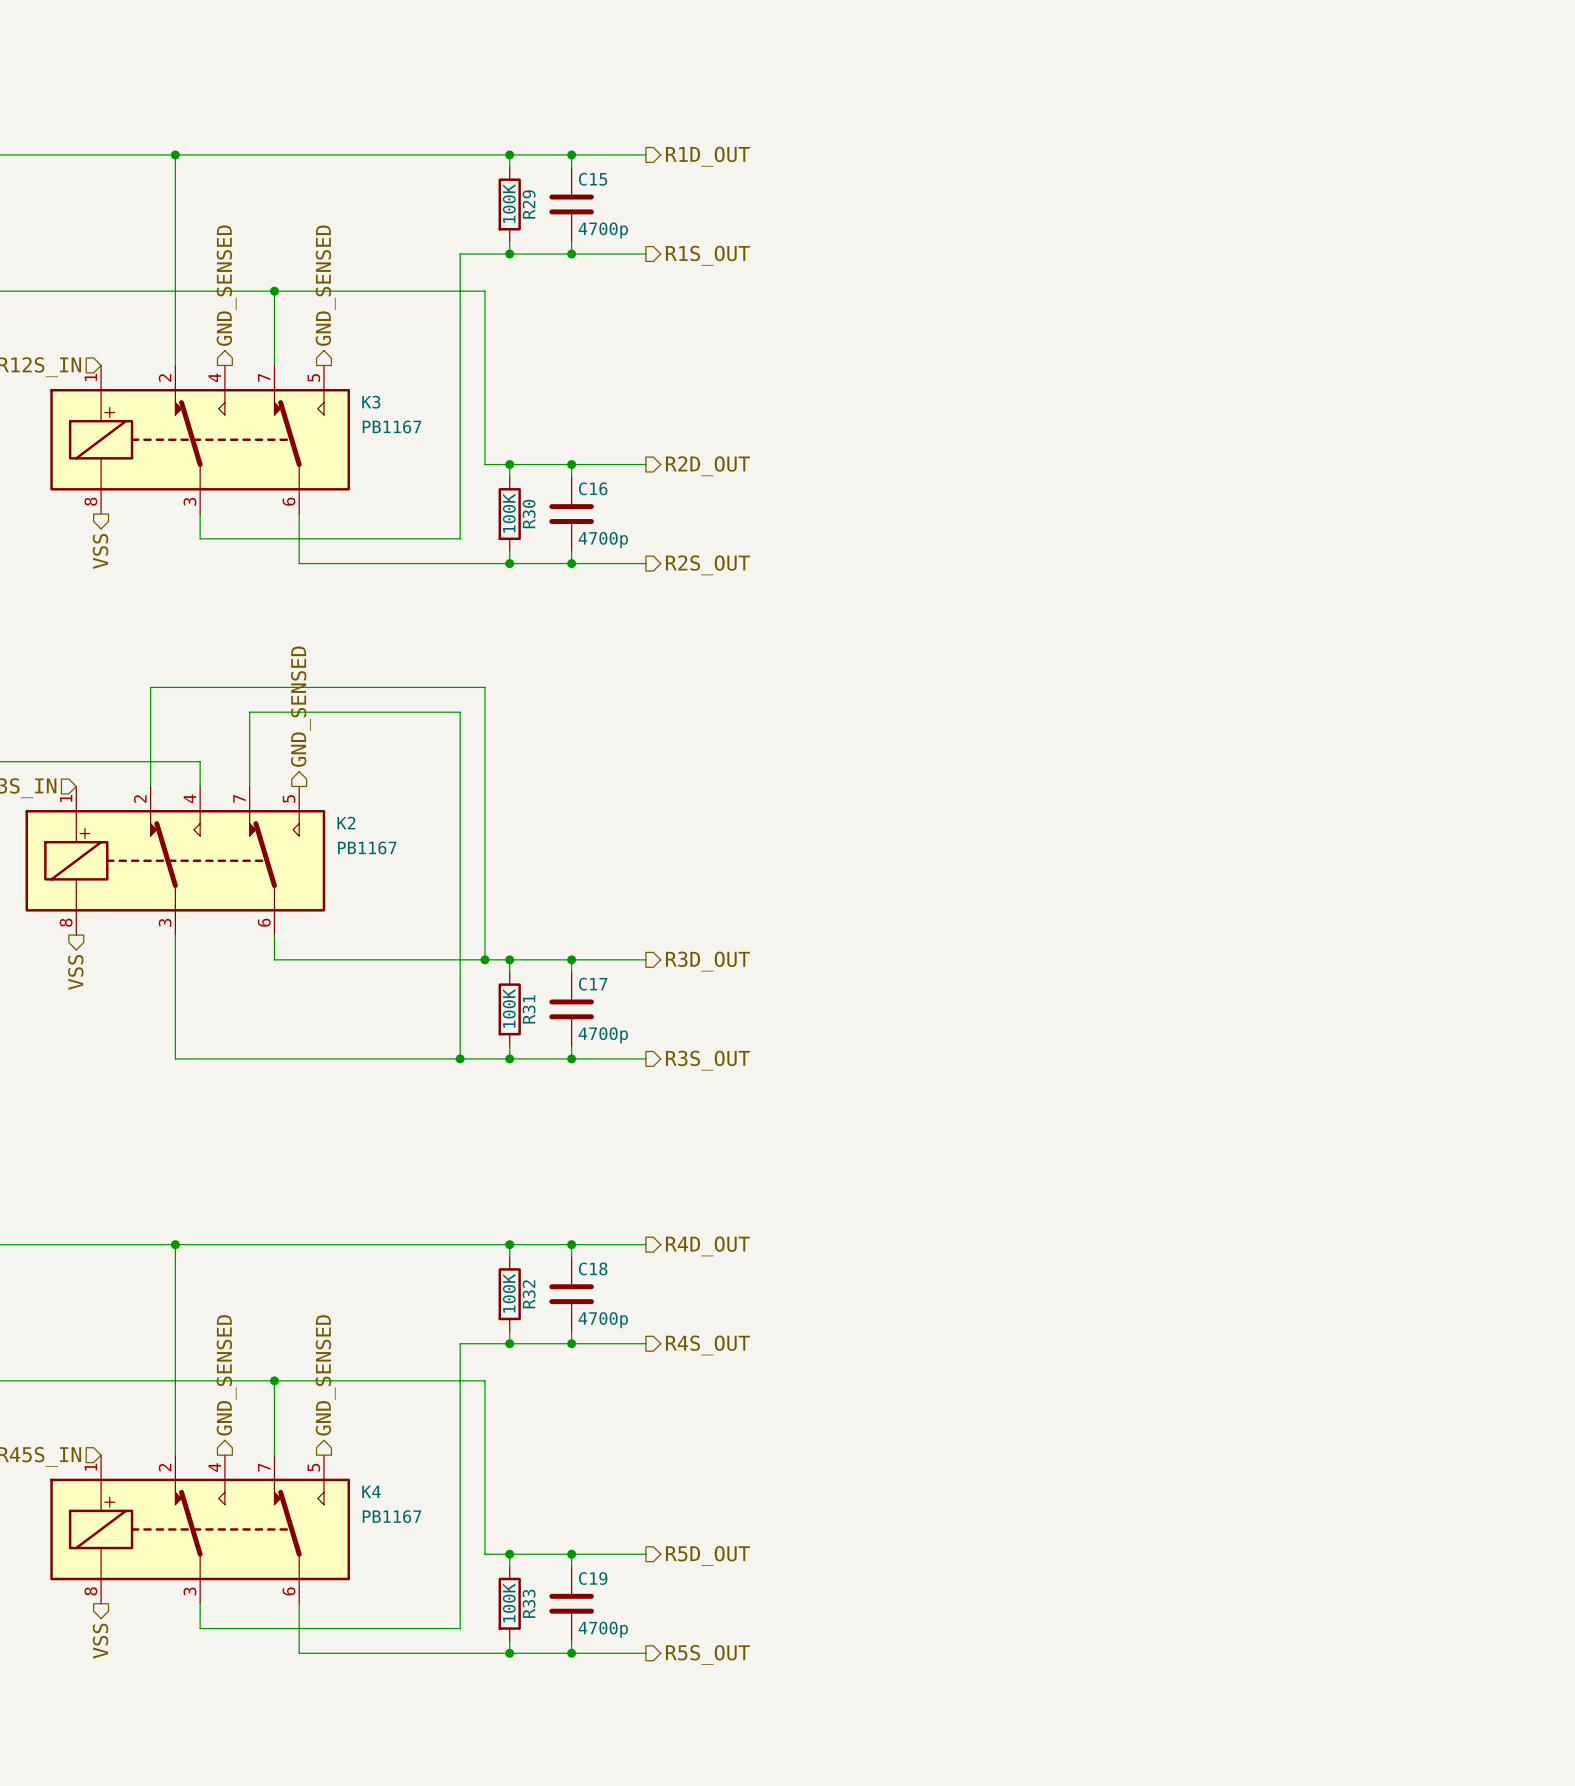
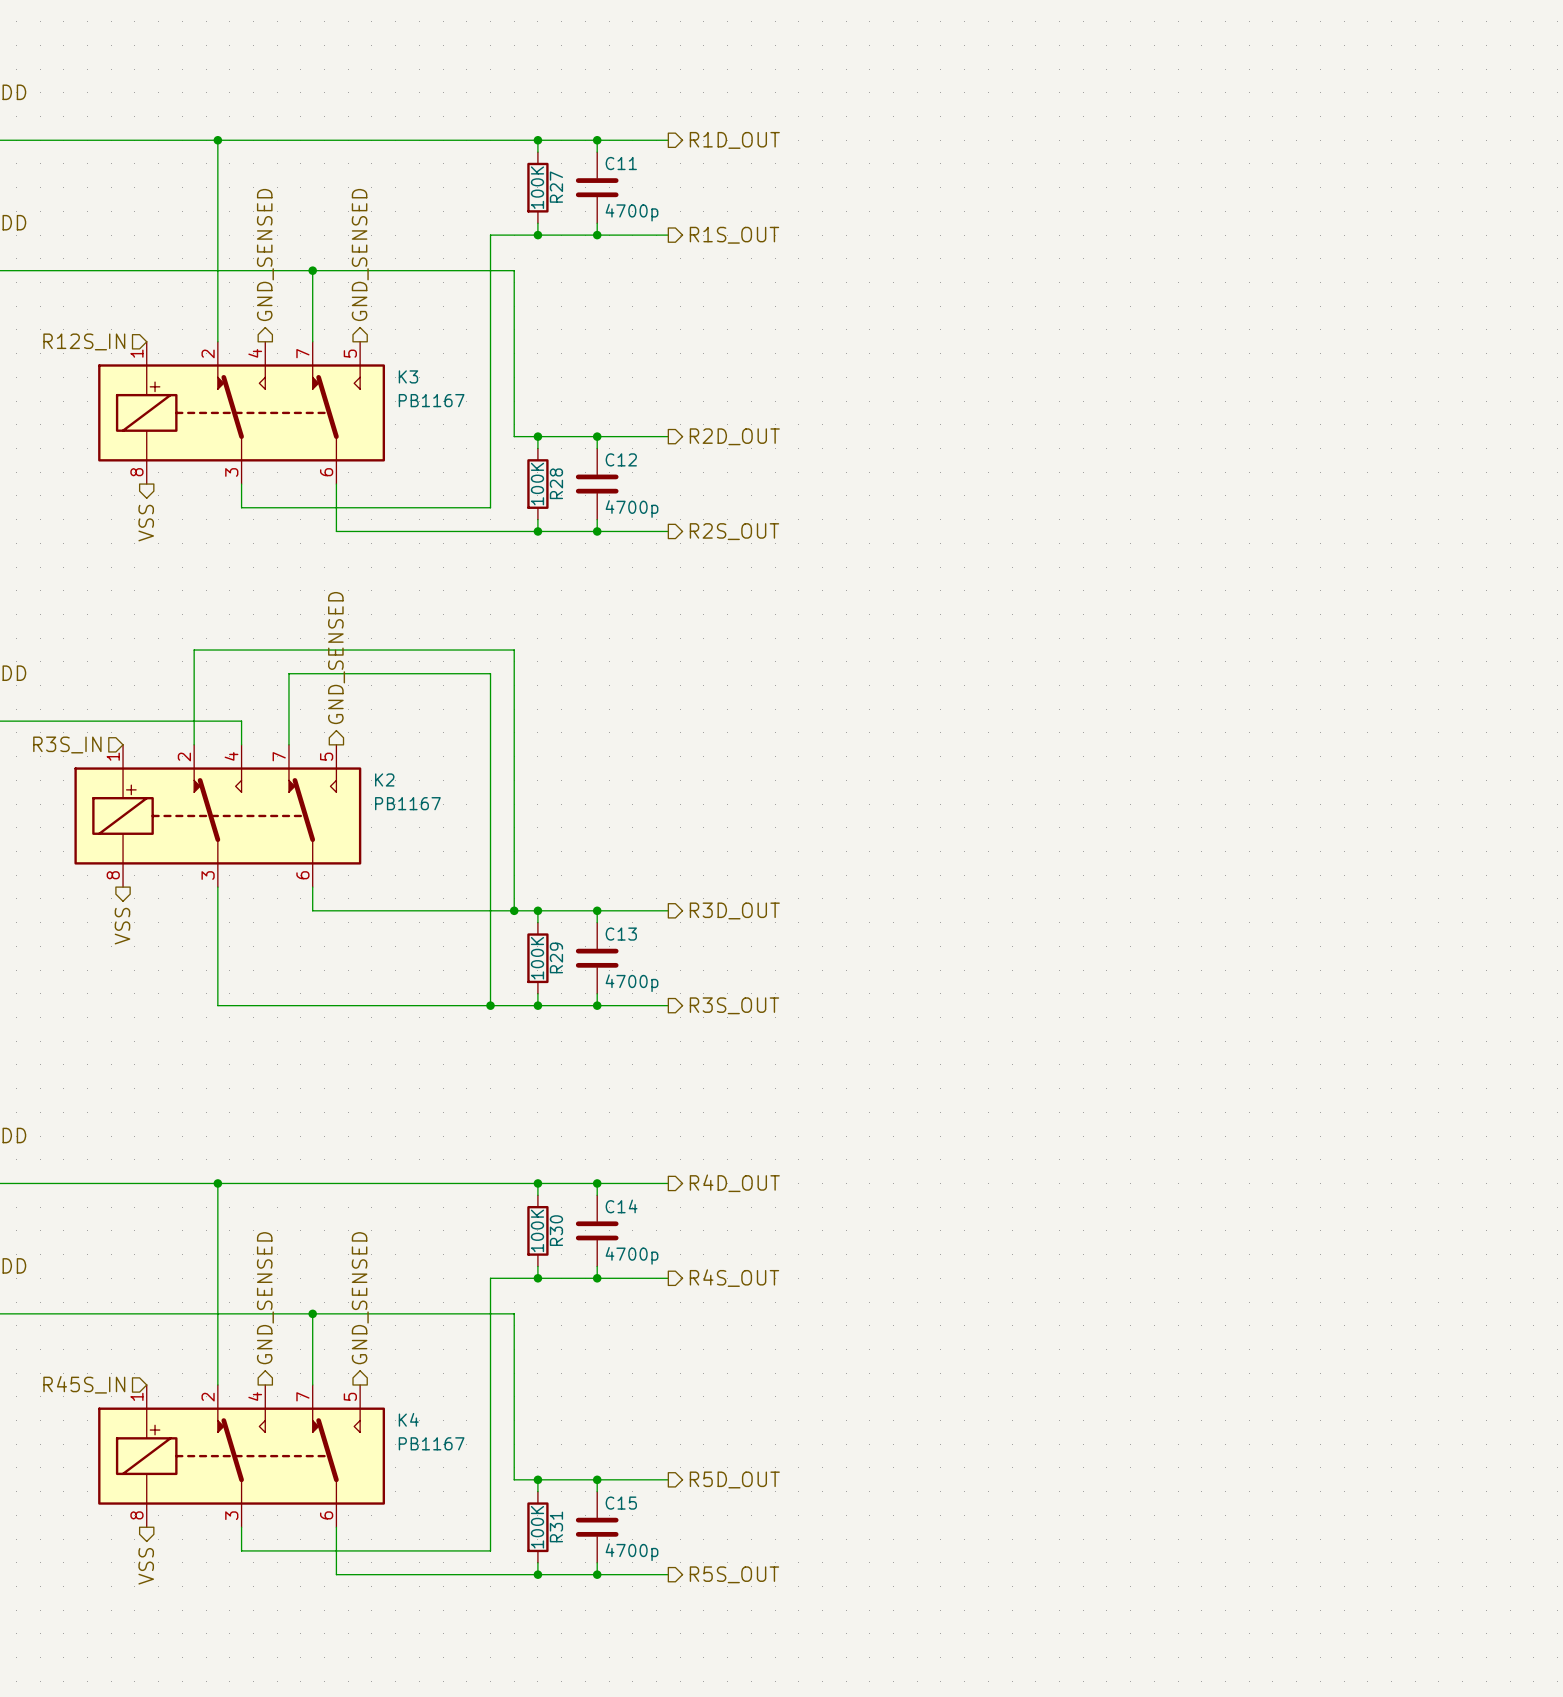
C15 name: C15 (593, 179) -> C11 (621, 163)
R29 name: R29 (529, 204) -> R27 (556, 187)
C16 name: C16 (593, 488) -> C12 (621, 459)
R30 name: R30 (529, 514) -> R28 (556, 483)
C17 name: C17 (593, 984) -> C13 (621, 934)
R31 name: R31 (529, 1009) -> R29 (556, 957)
C18 name: C18 (593, 1268) -> C14 (621, 1206)
R32 name: R32 (529, 1294) -> R30 (556, 1230)
C19 name: C19 (593, 1578) -> C15 (621, 1503)
R33 name: R33 (529, 1603) -> R31 (556, 1526)

